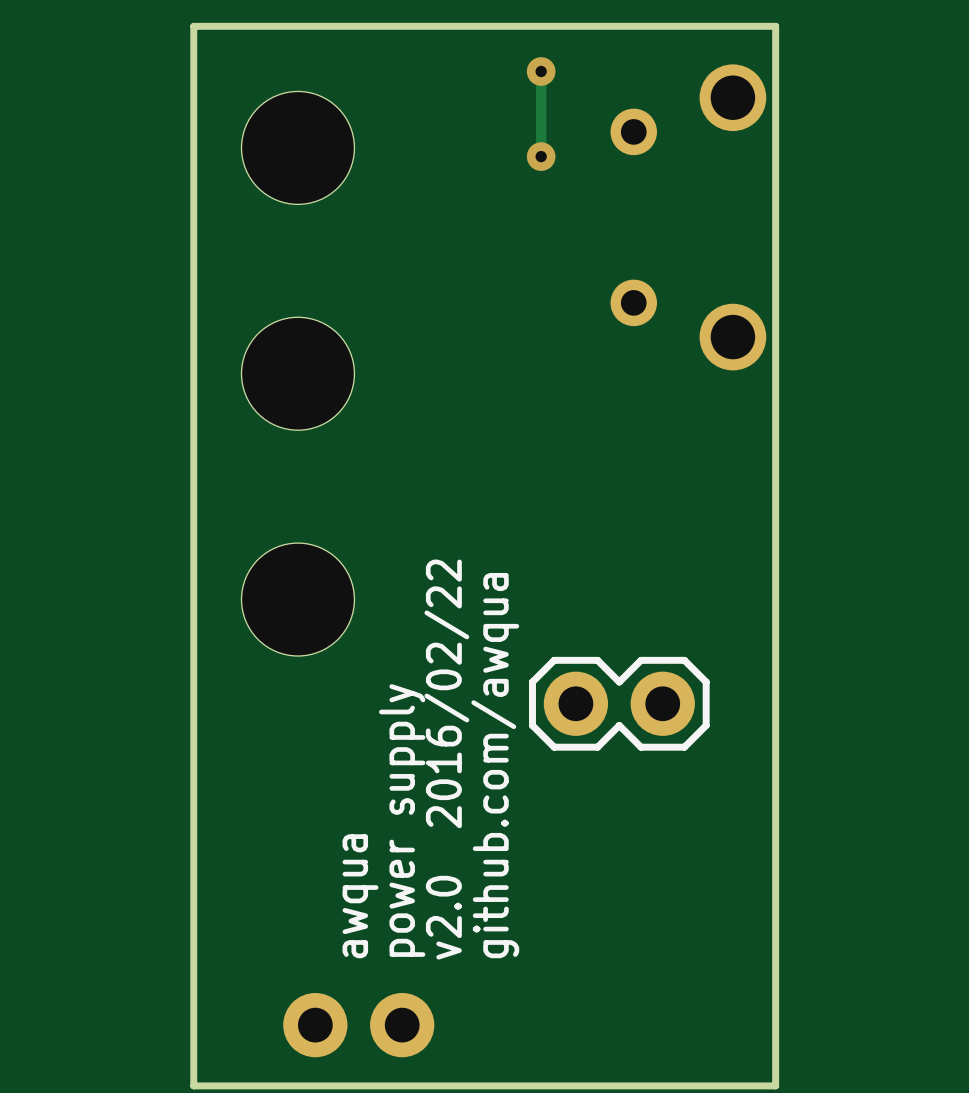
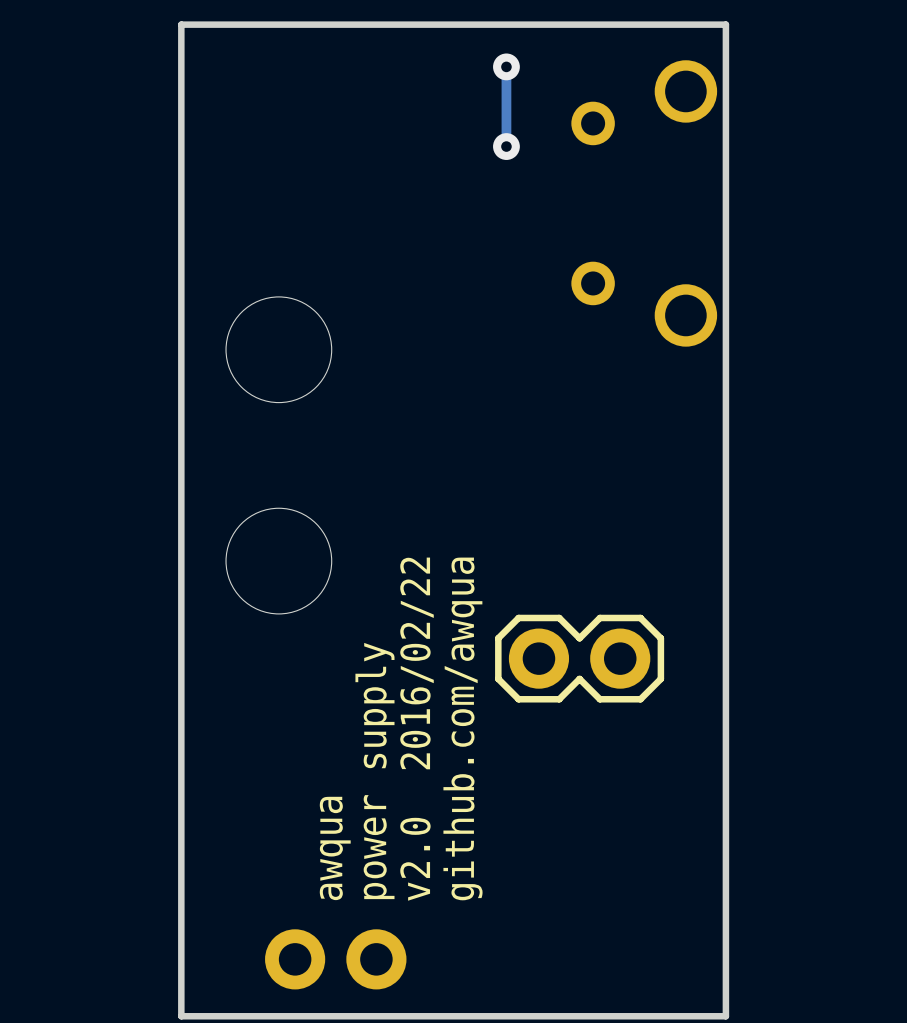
part: (297, 147) -> none

